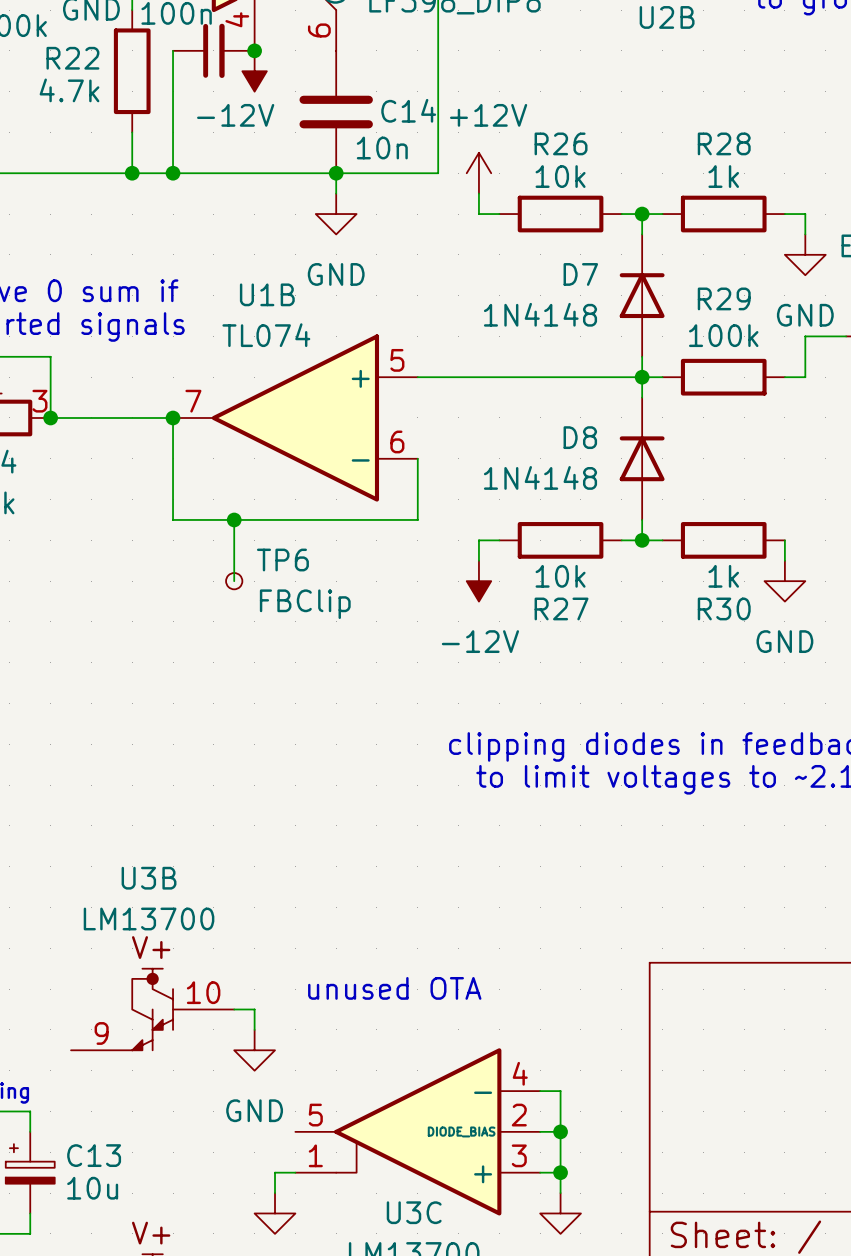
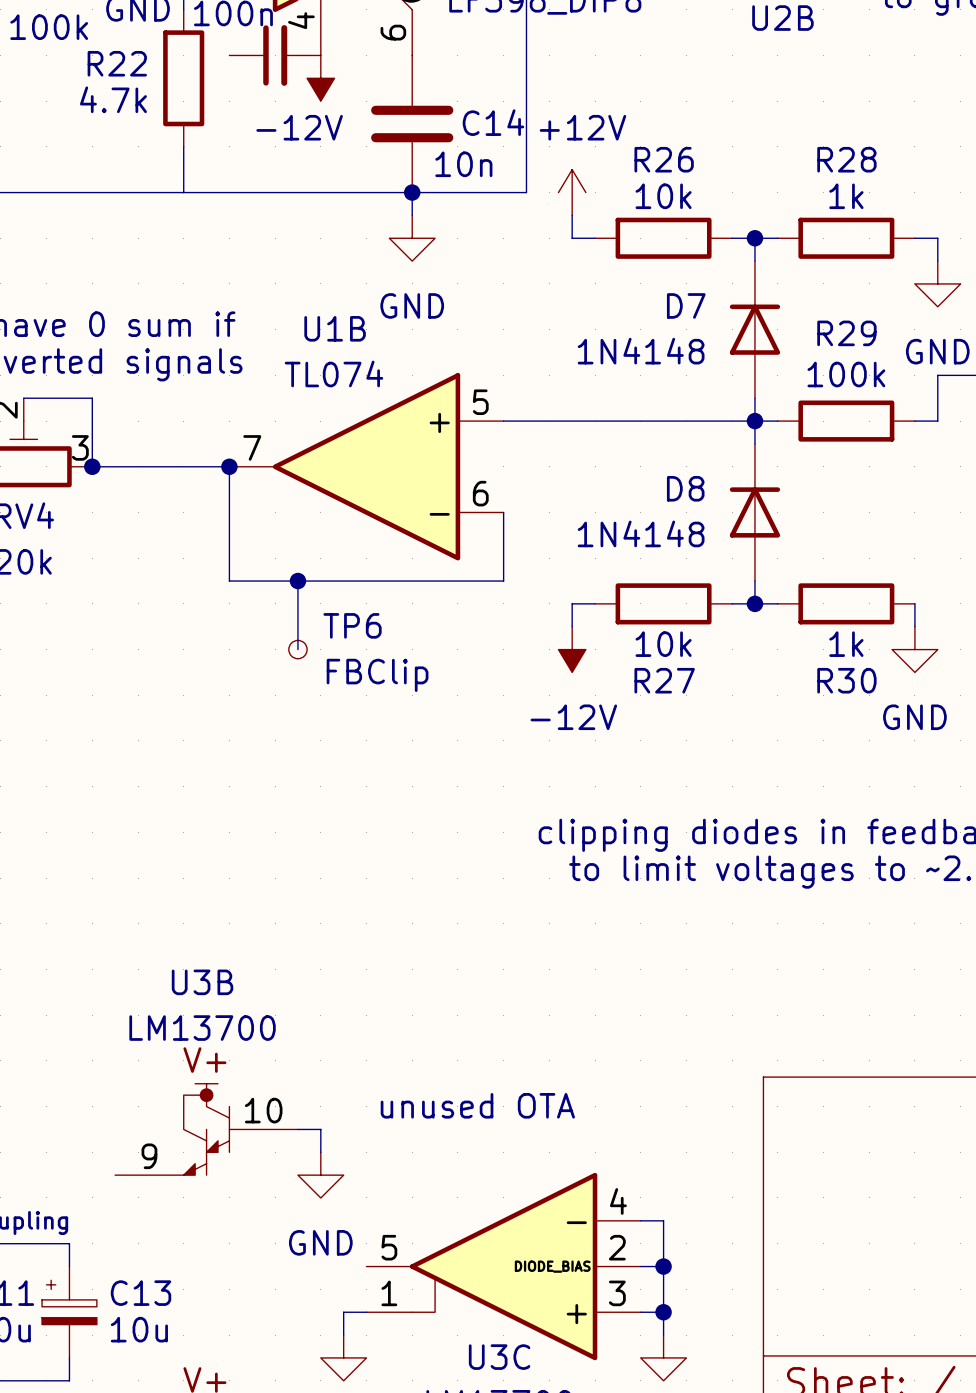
wire: (173, 50) (173, 173) -> none
junction: (254, 50) -> none
junction: (132, 173) -> none
junction: (173, 173) -> none

